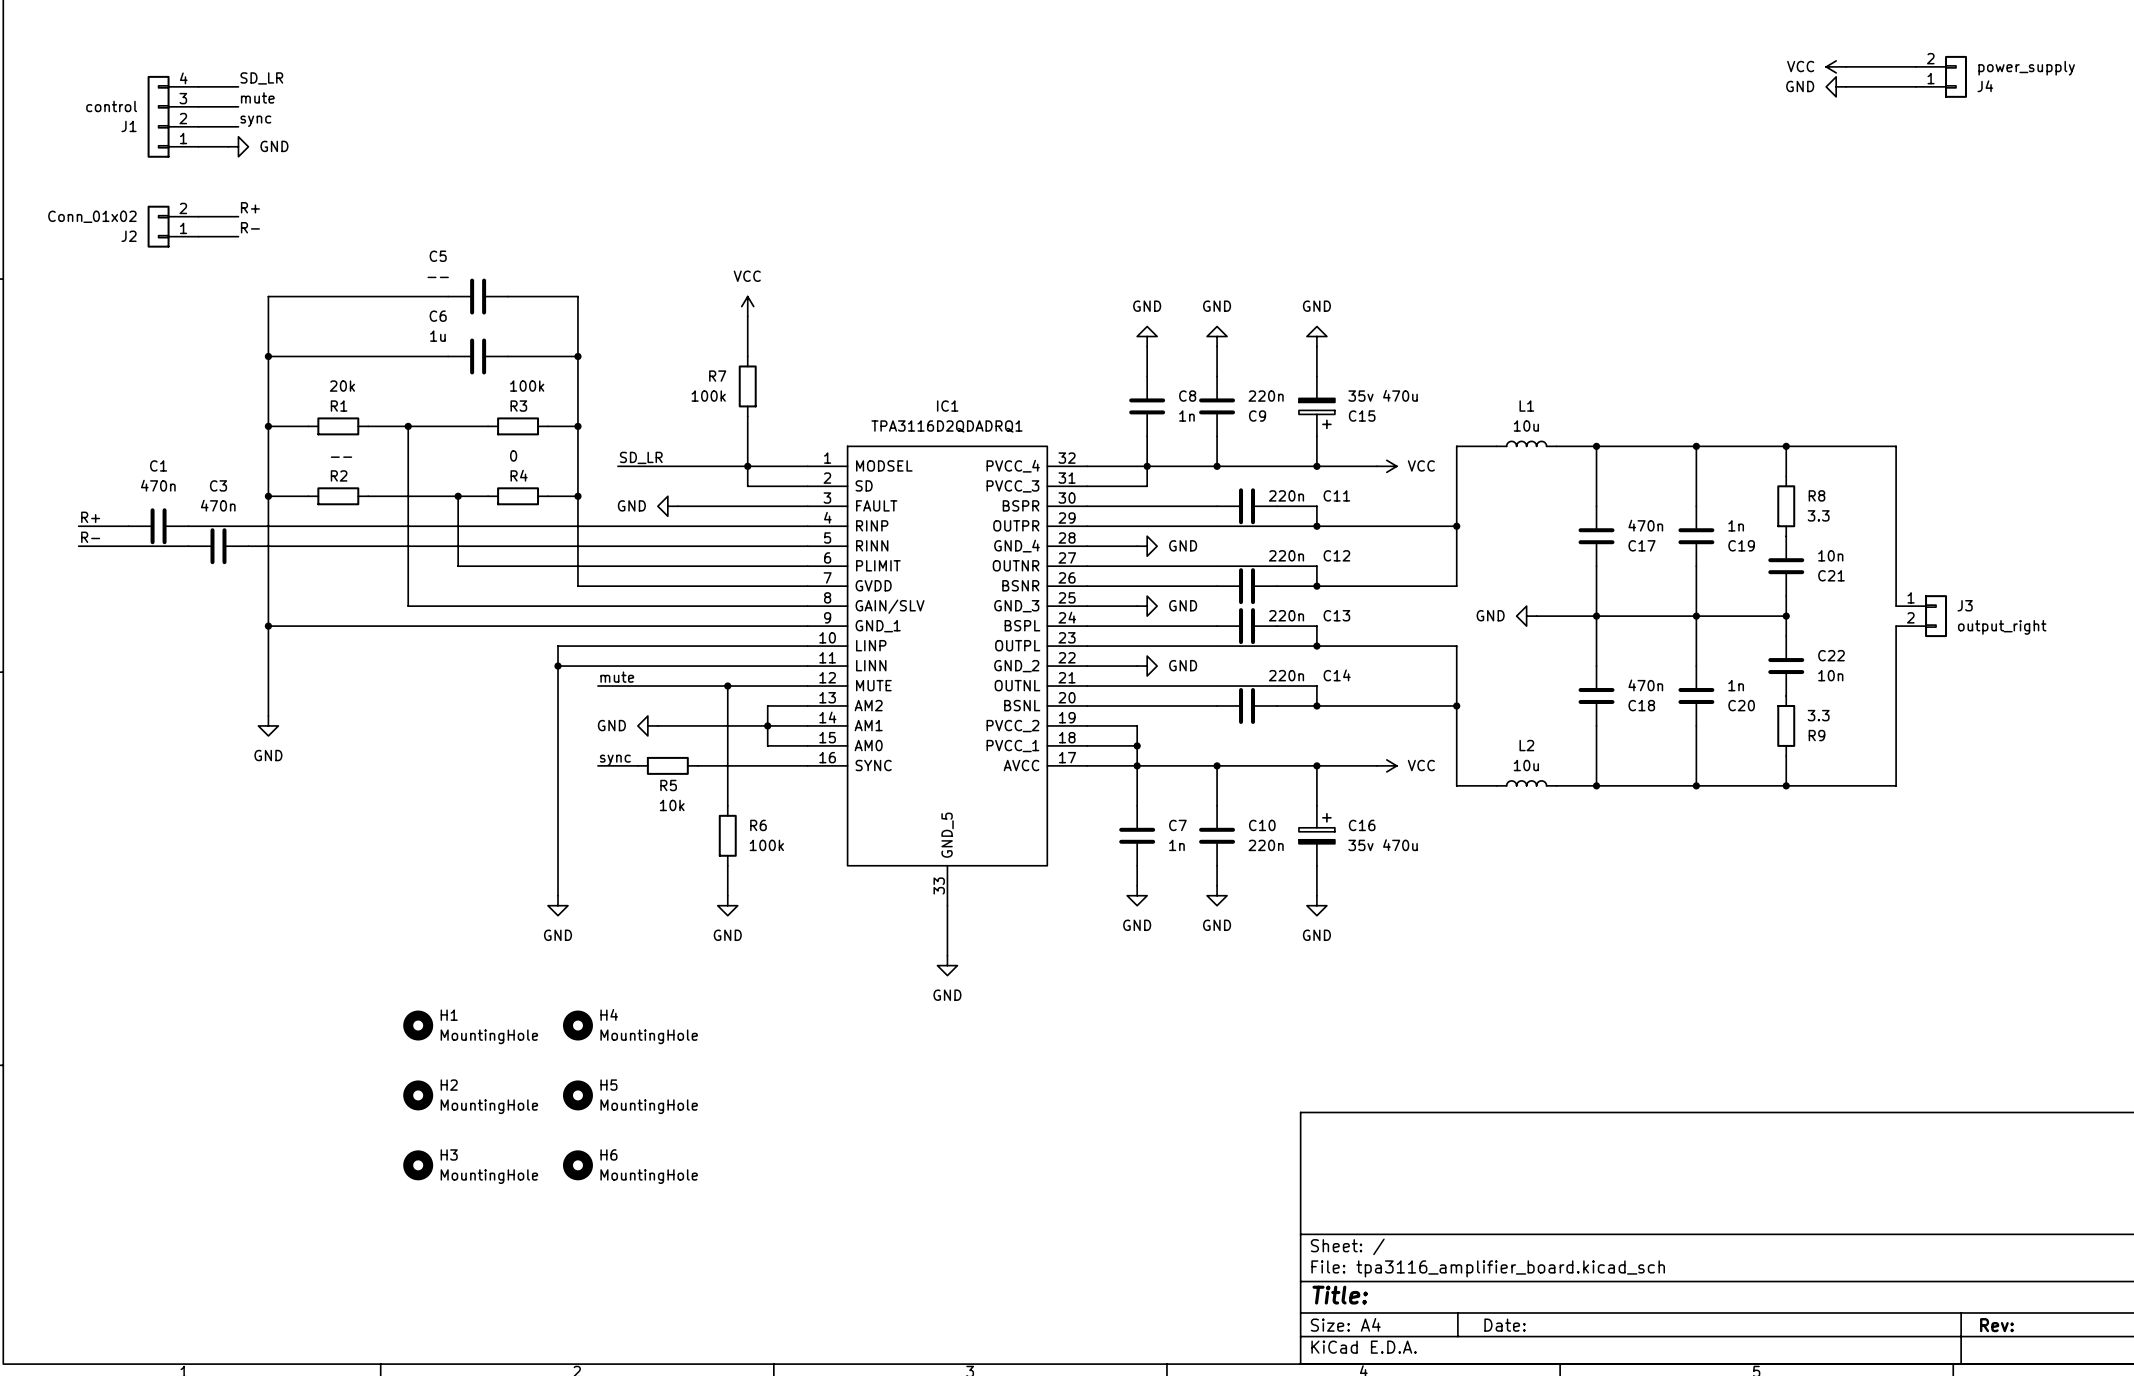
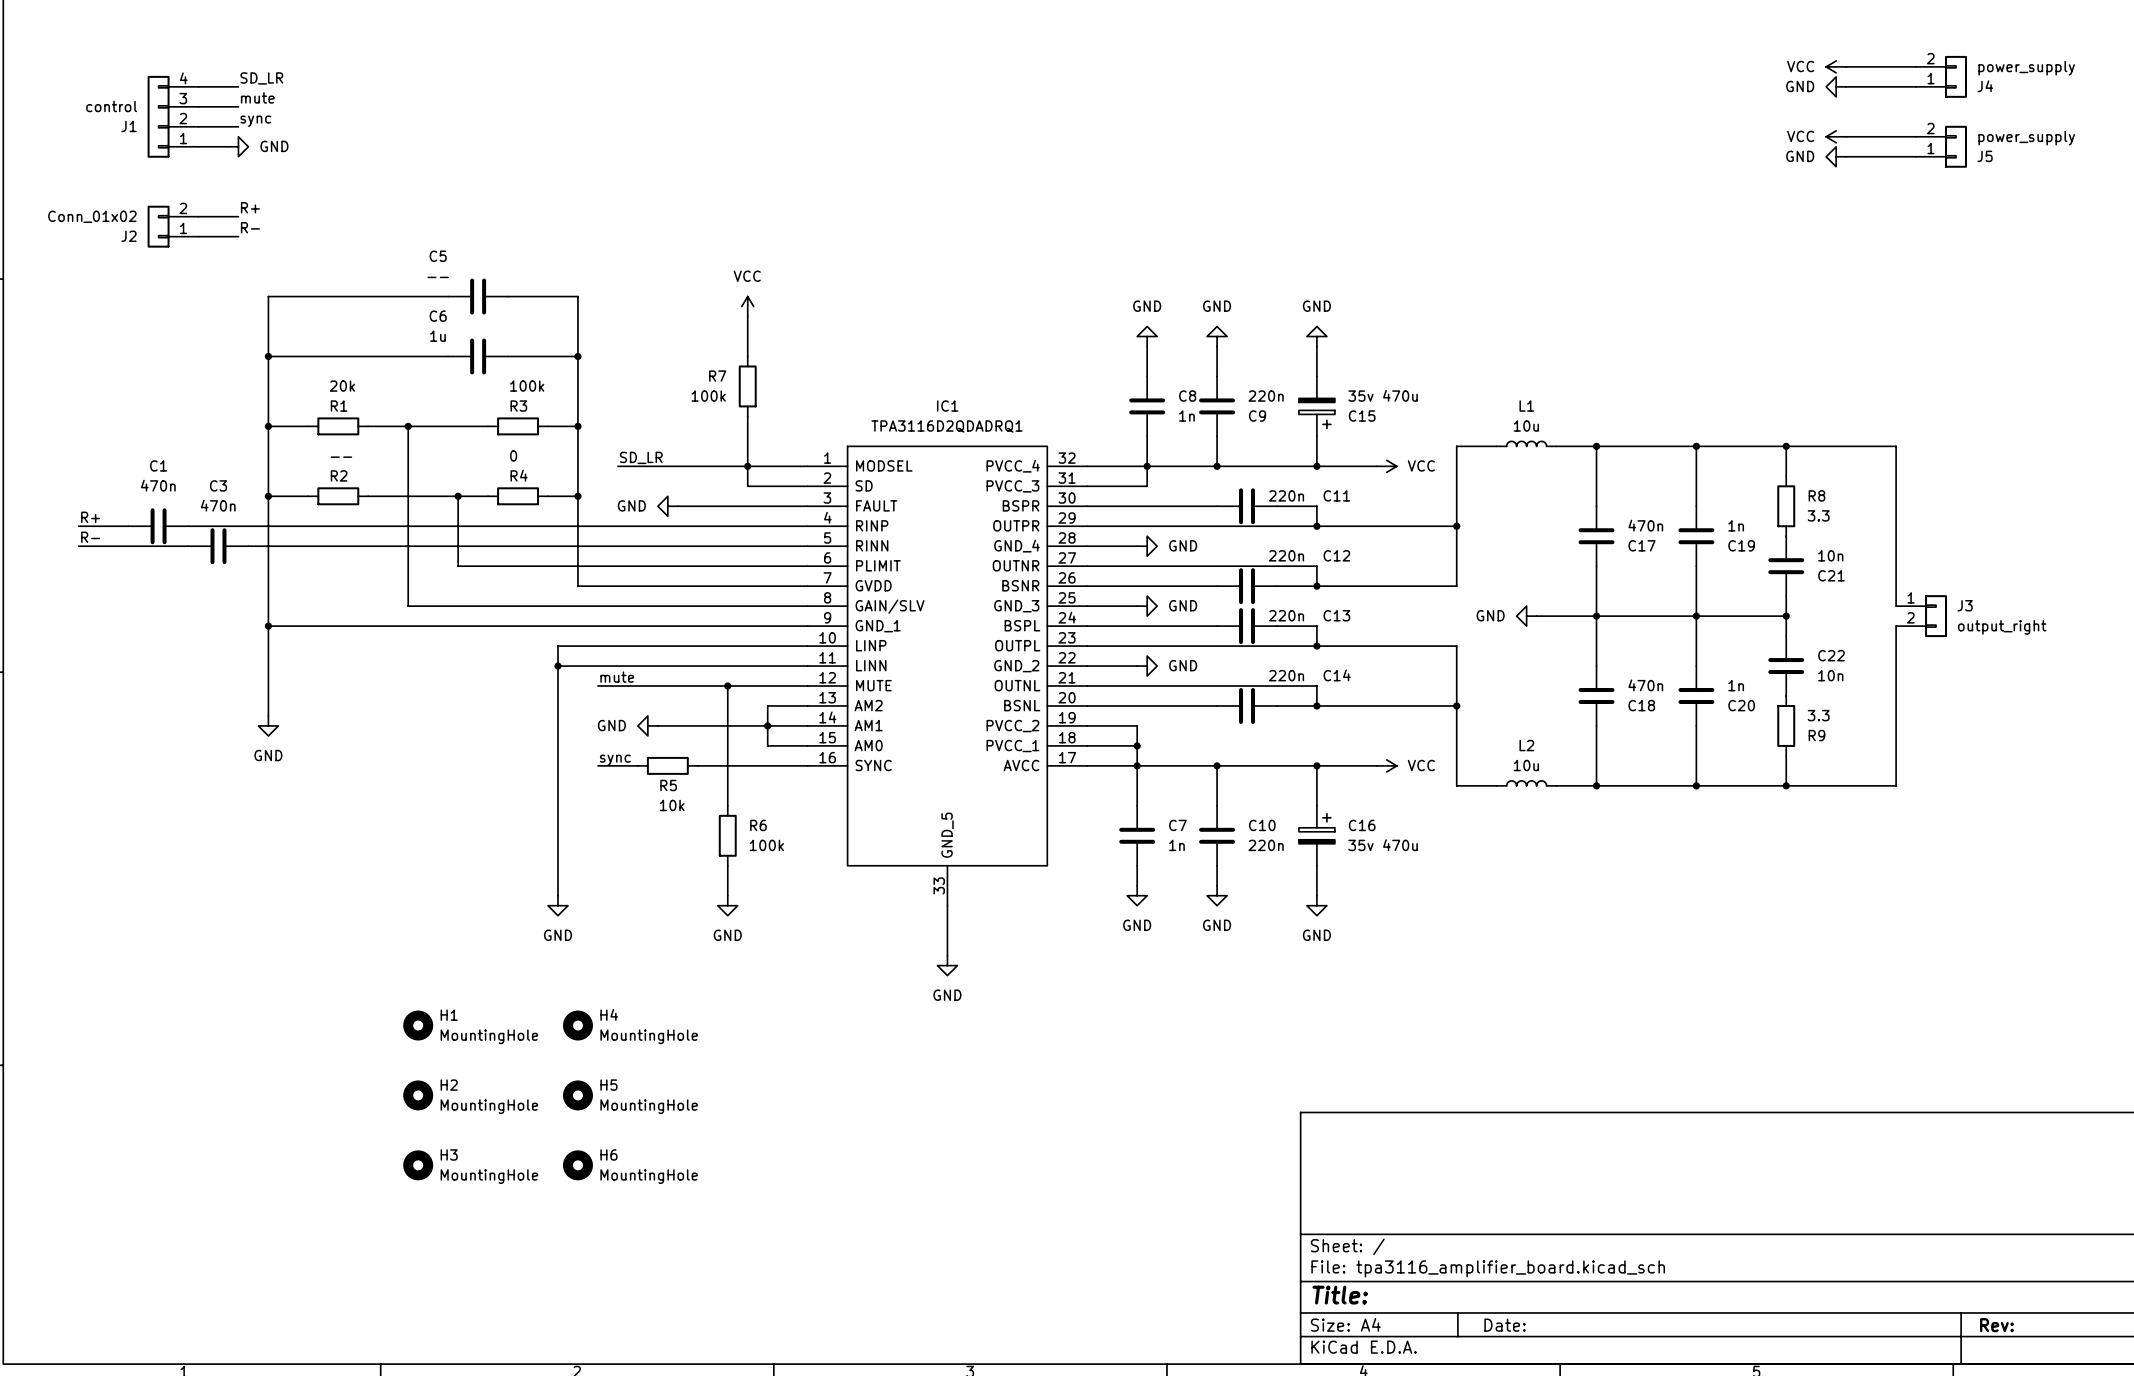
power symbol: none -> VCC (1836, 136)
wire: none -> (1846, 136) (1916, 136)
J5: none -> power_supply (1941, 146)
power symbol: none -> GND (1836, 156)
wire: none -> (1846, 156) (1916, 156)

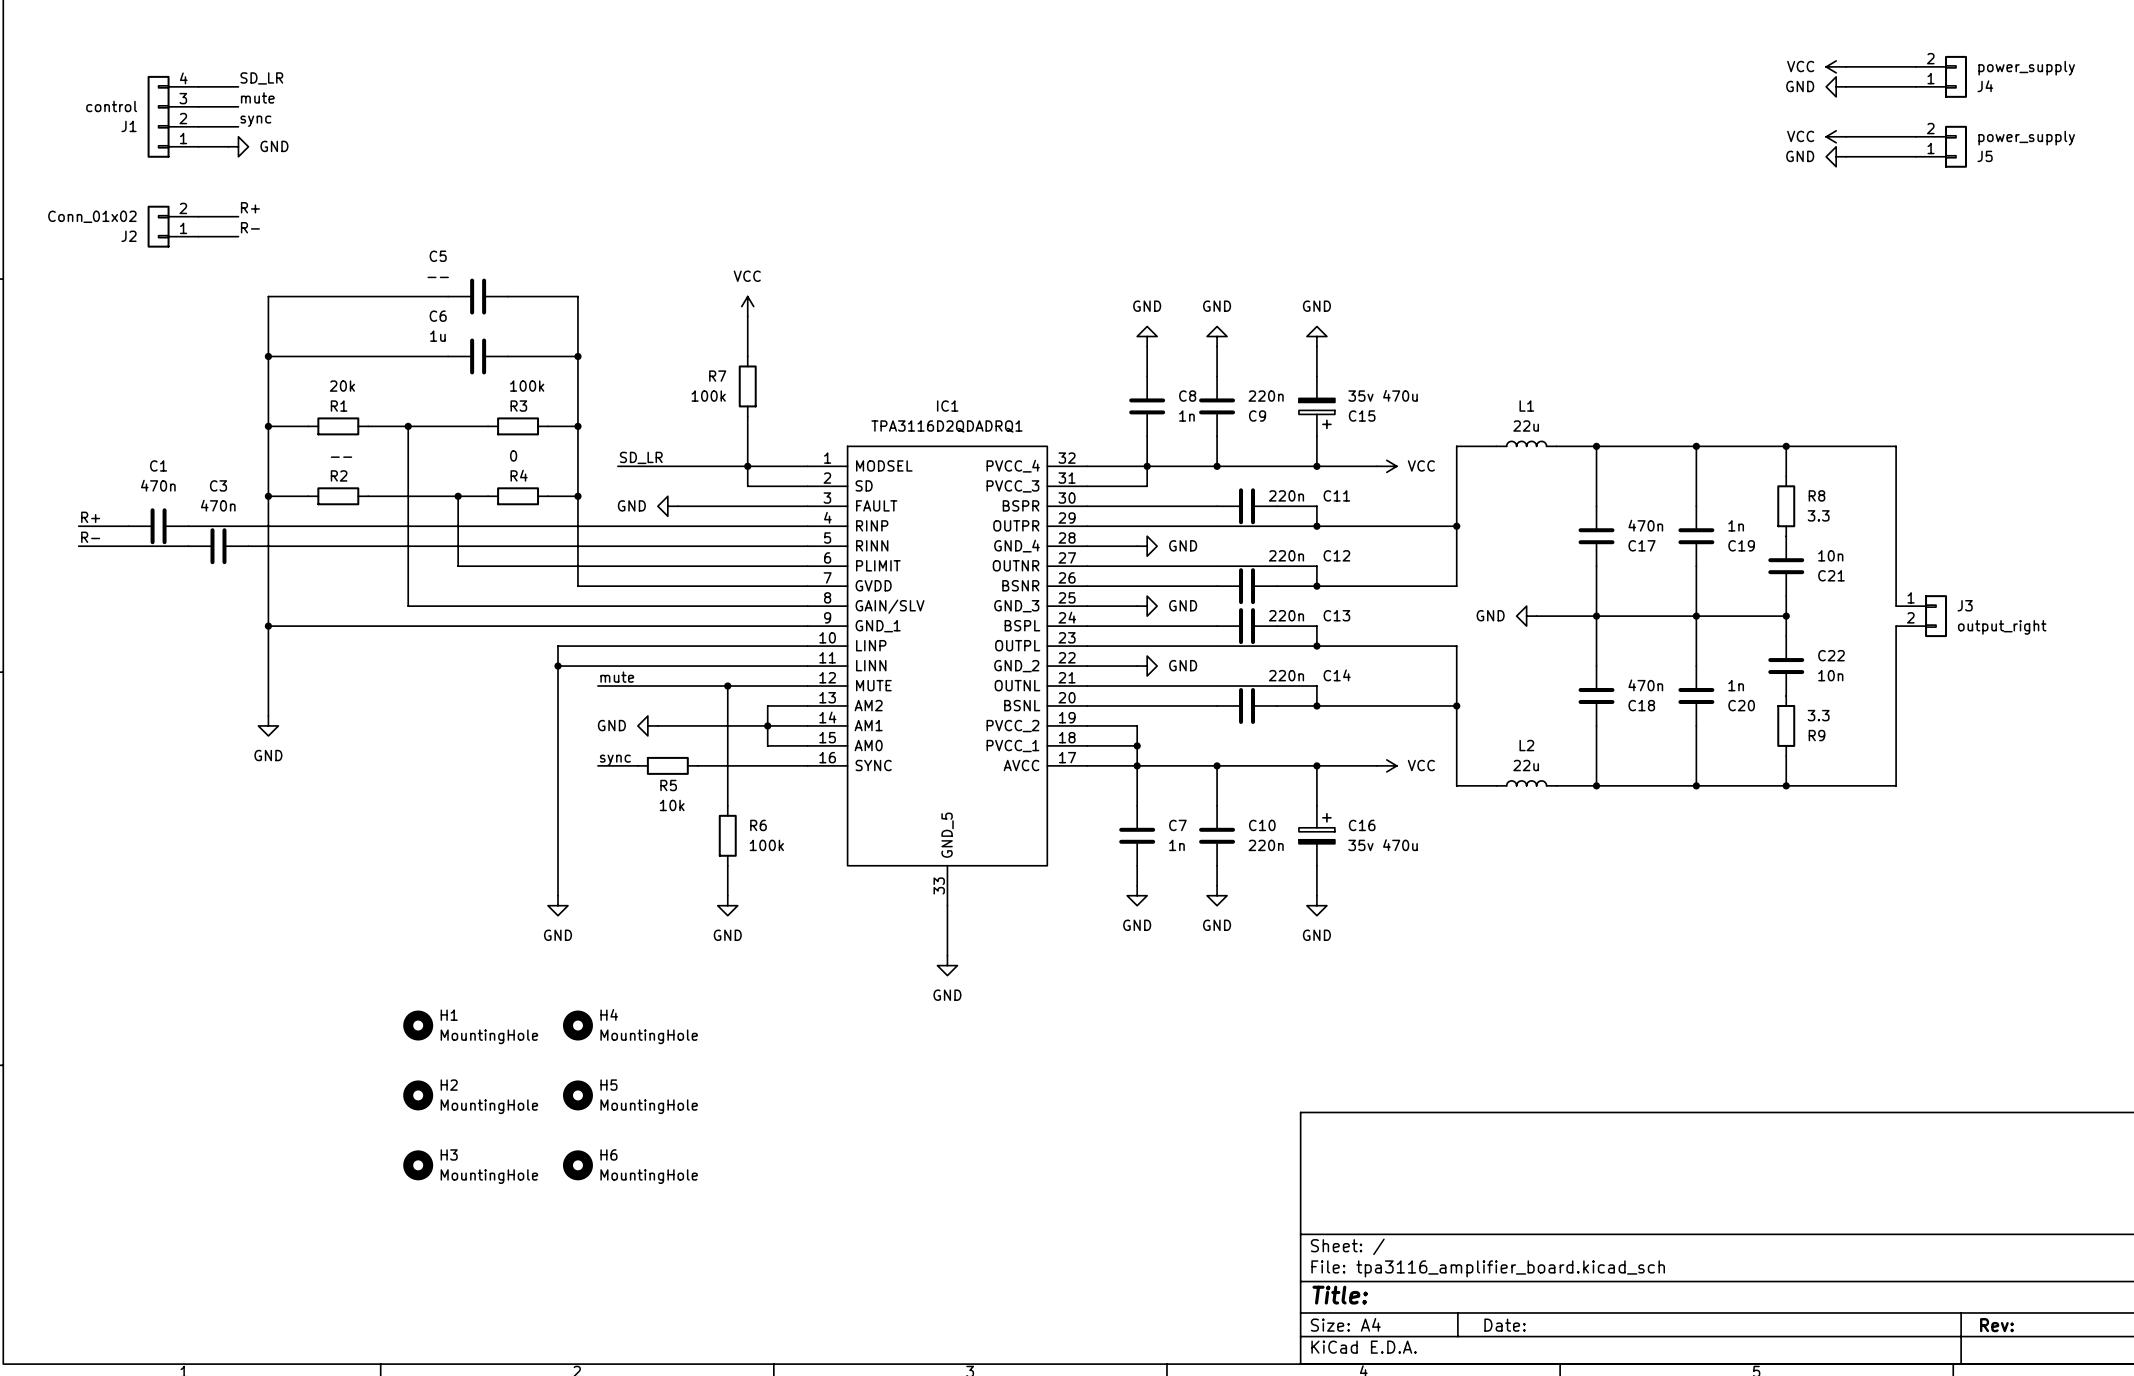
L1 value: 10u (1526, 426) -> 22u (1526, 426)
L2 value: 10u (1526, 765) -> 22u (1526, 765)

